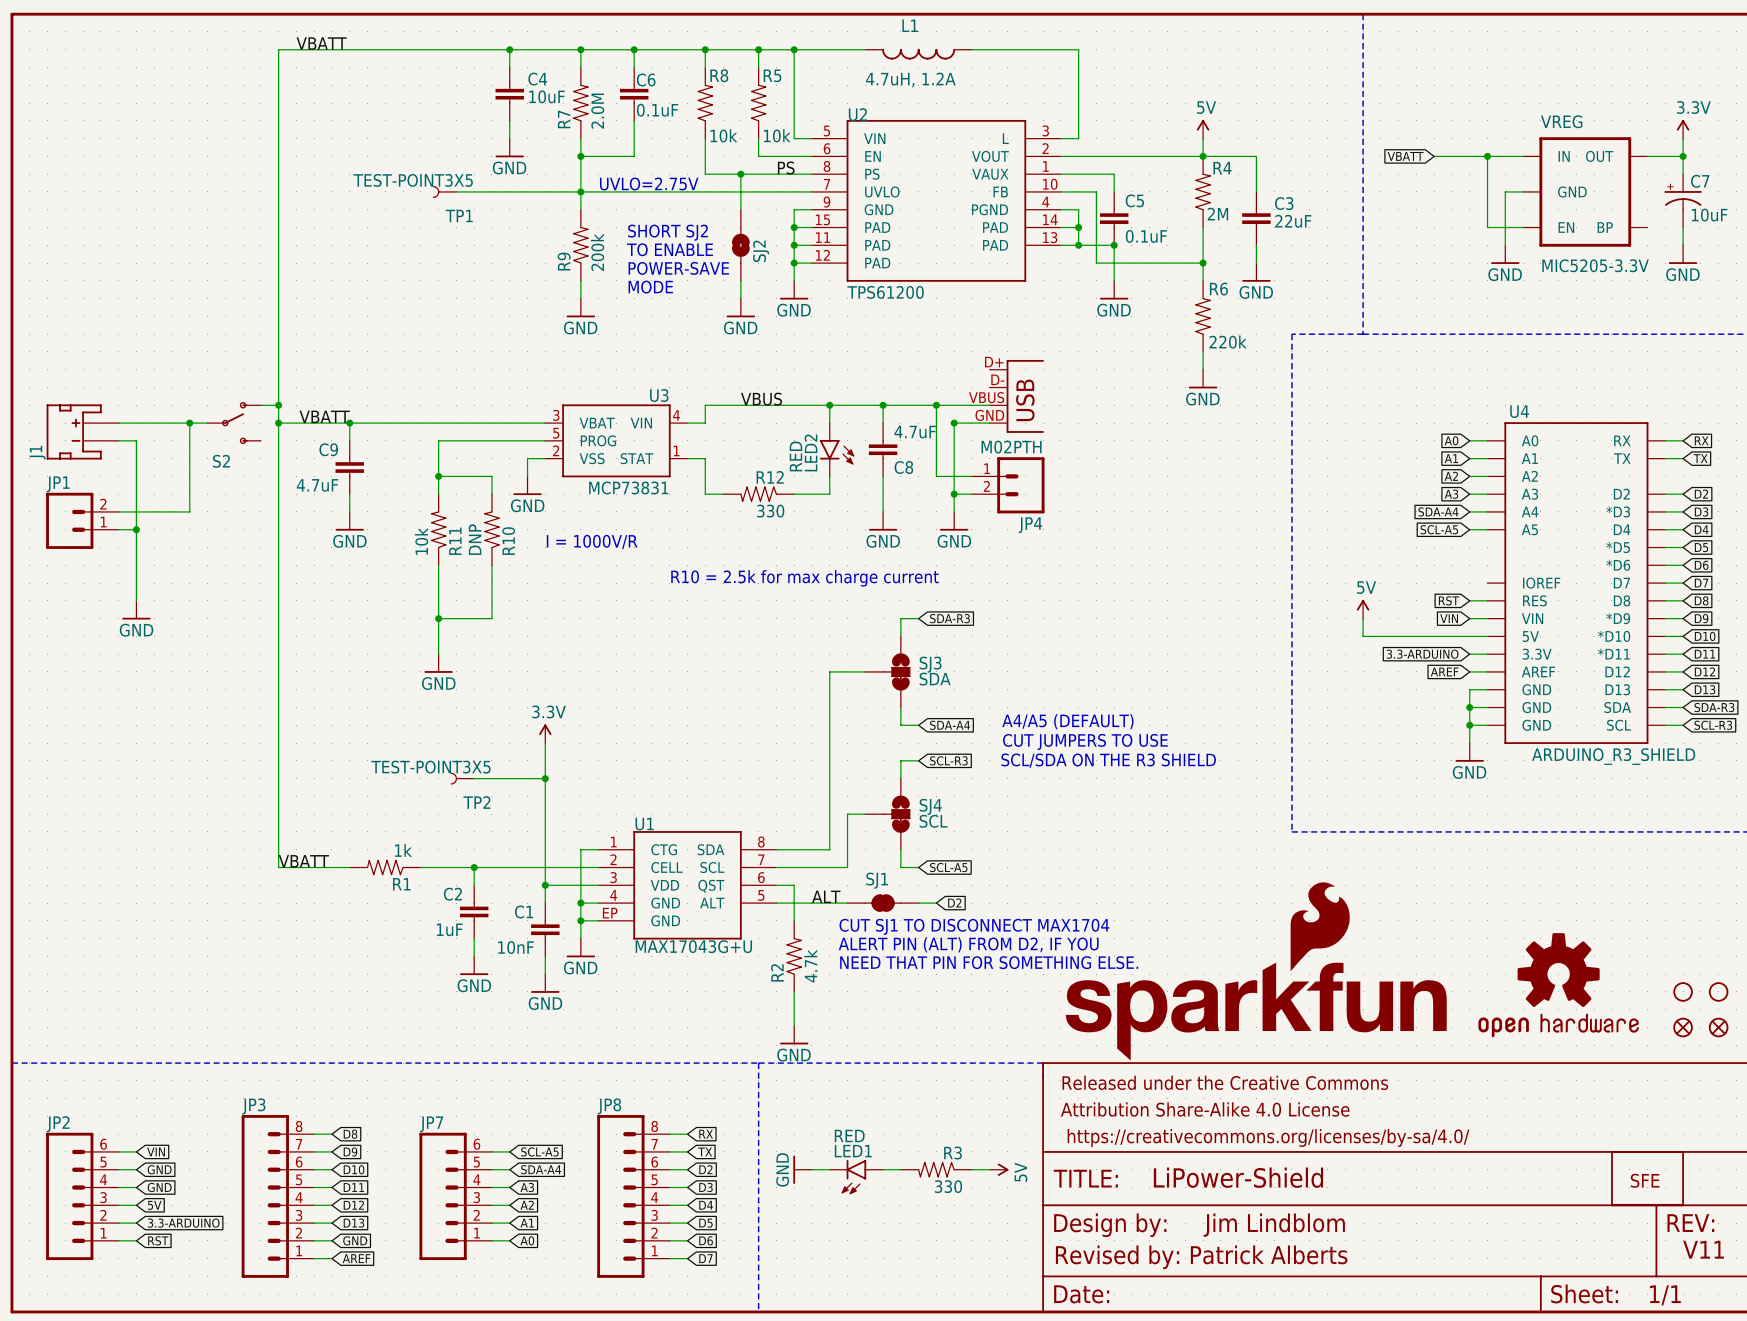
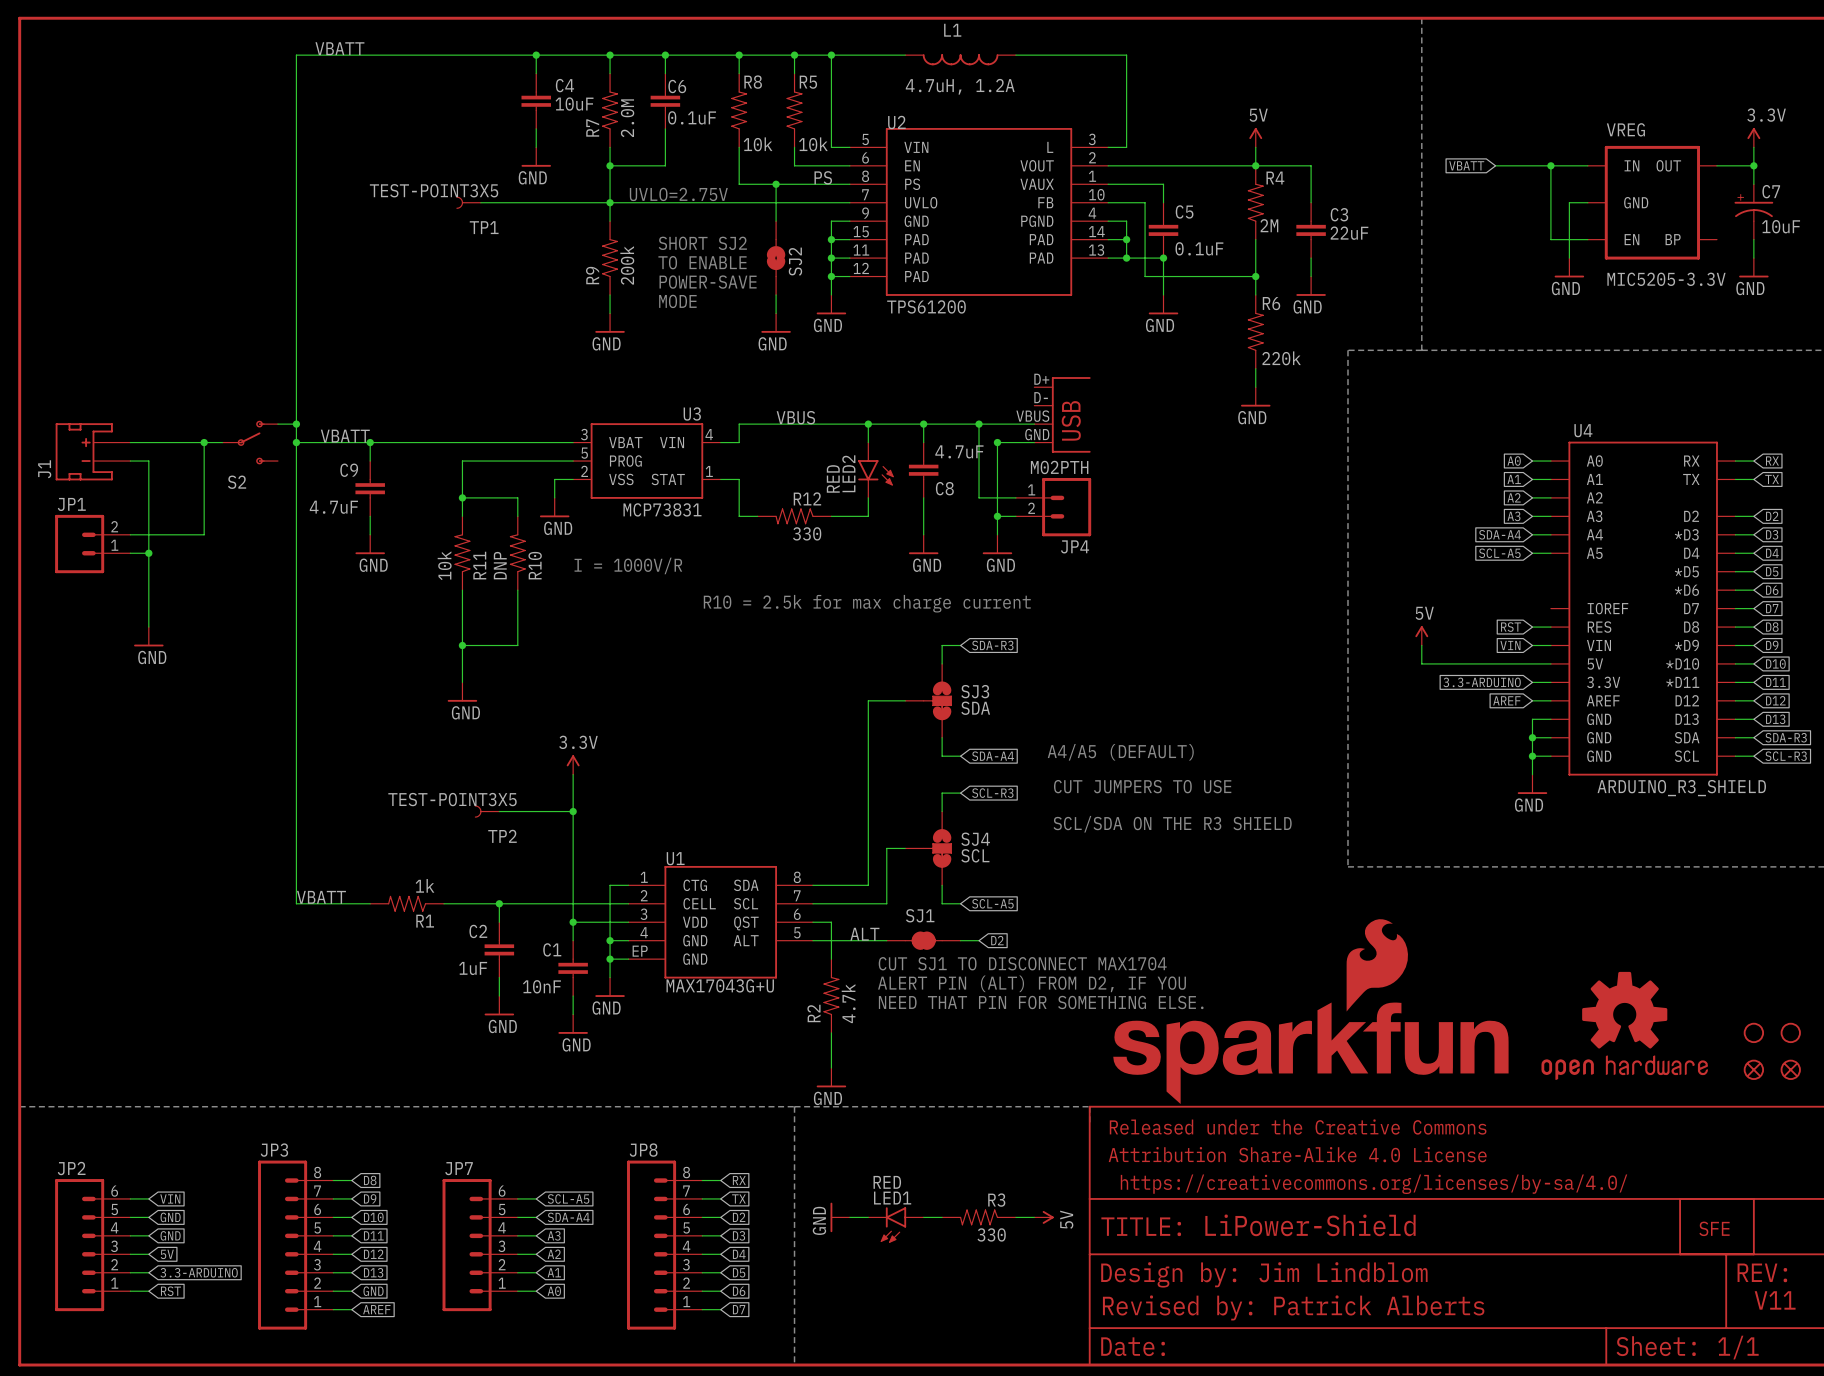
text position: CUT JUMPERS TO USE (1085, 742) -> CUT JUMPERS TO USE (1142, 786)
text position: SCL/SDA ON THE R3 SHIELD (1108, 760) -> SCL/SDA ON THE R3 SHIELD (1172, 824)

